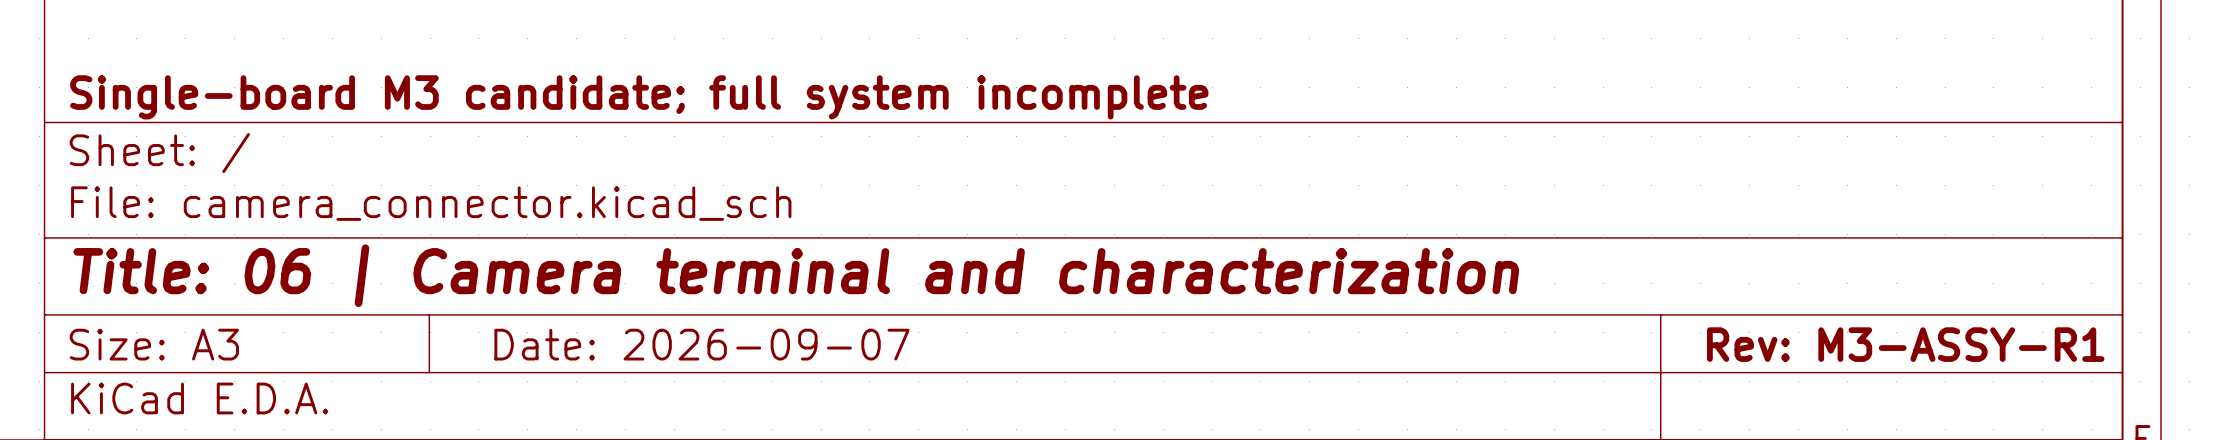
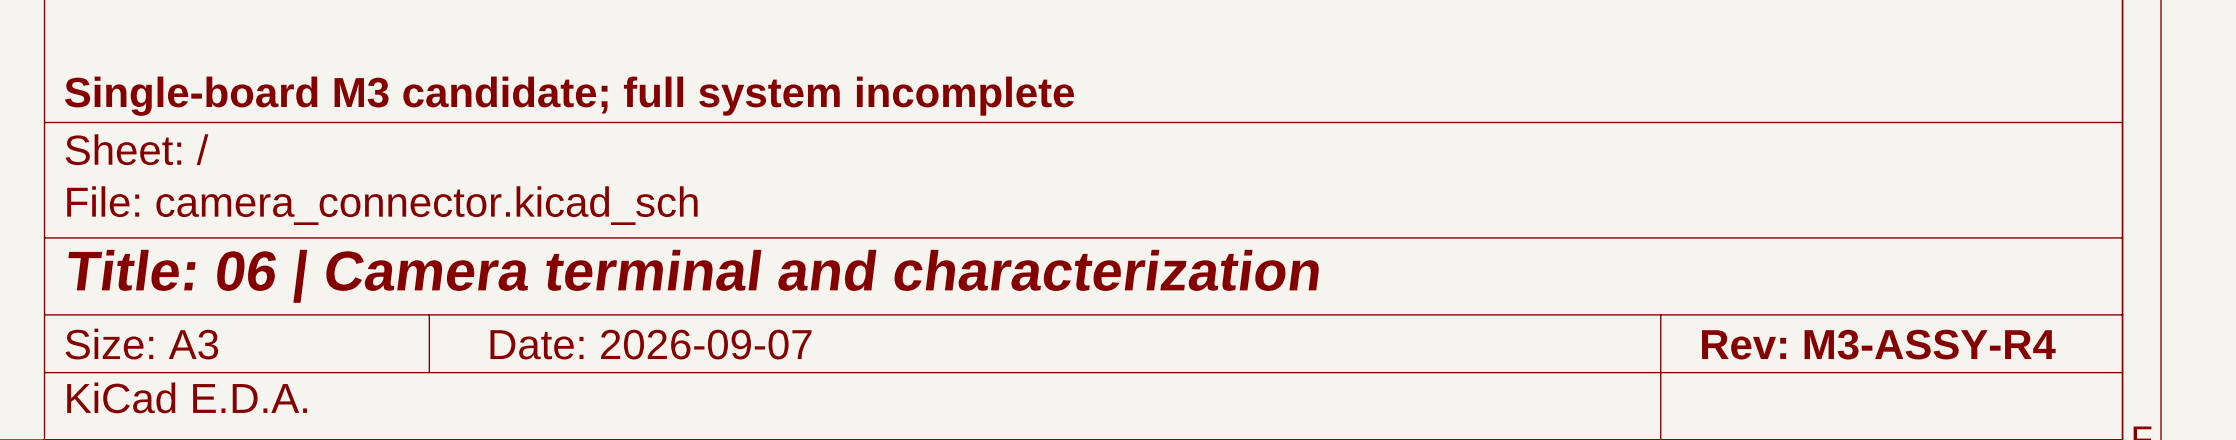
title block: Rev: M3-ASSY-R1 (1905, 344) -> Rev: M3-ASSY-R4 (1878, 344)

